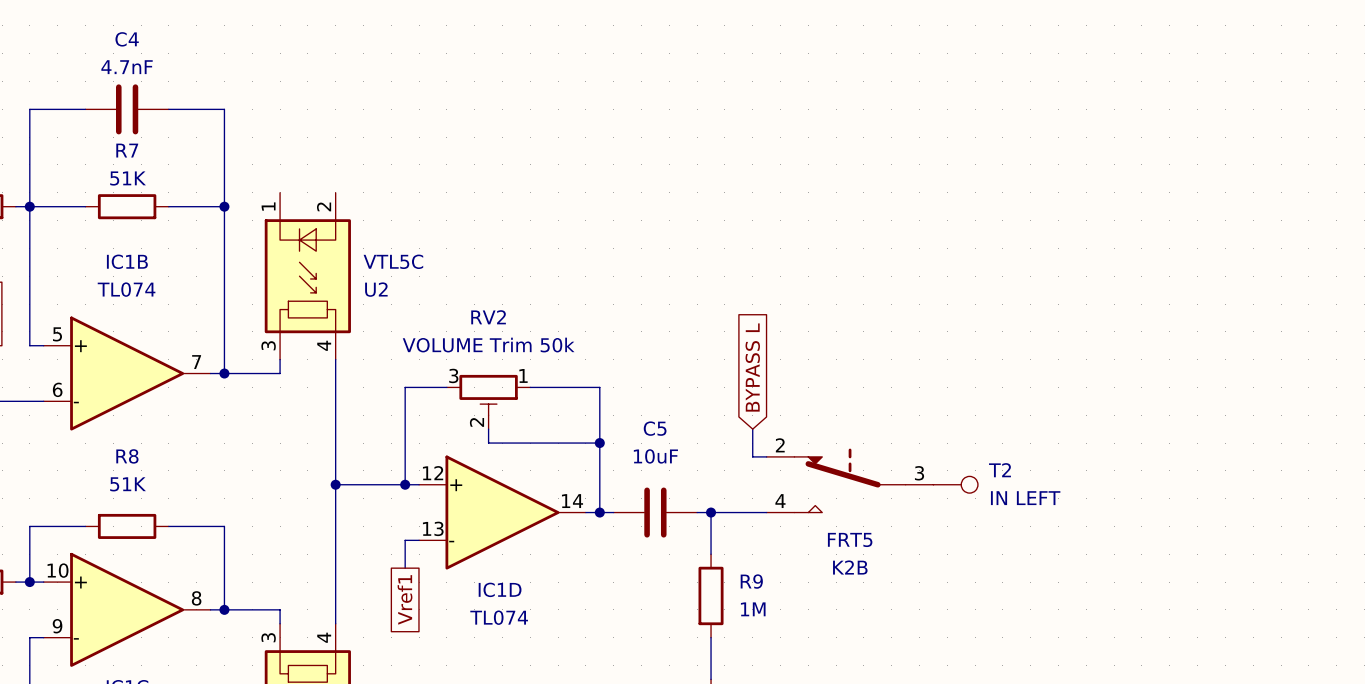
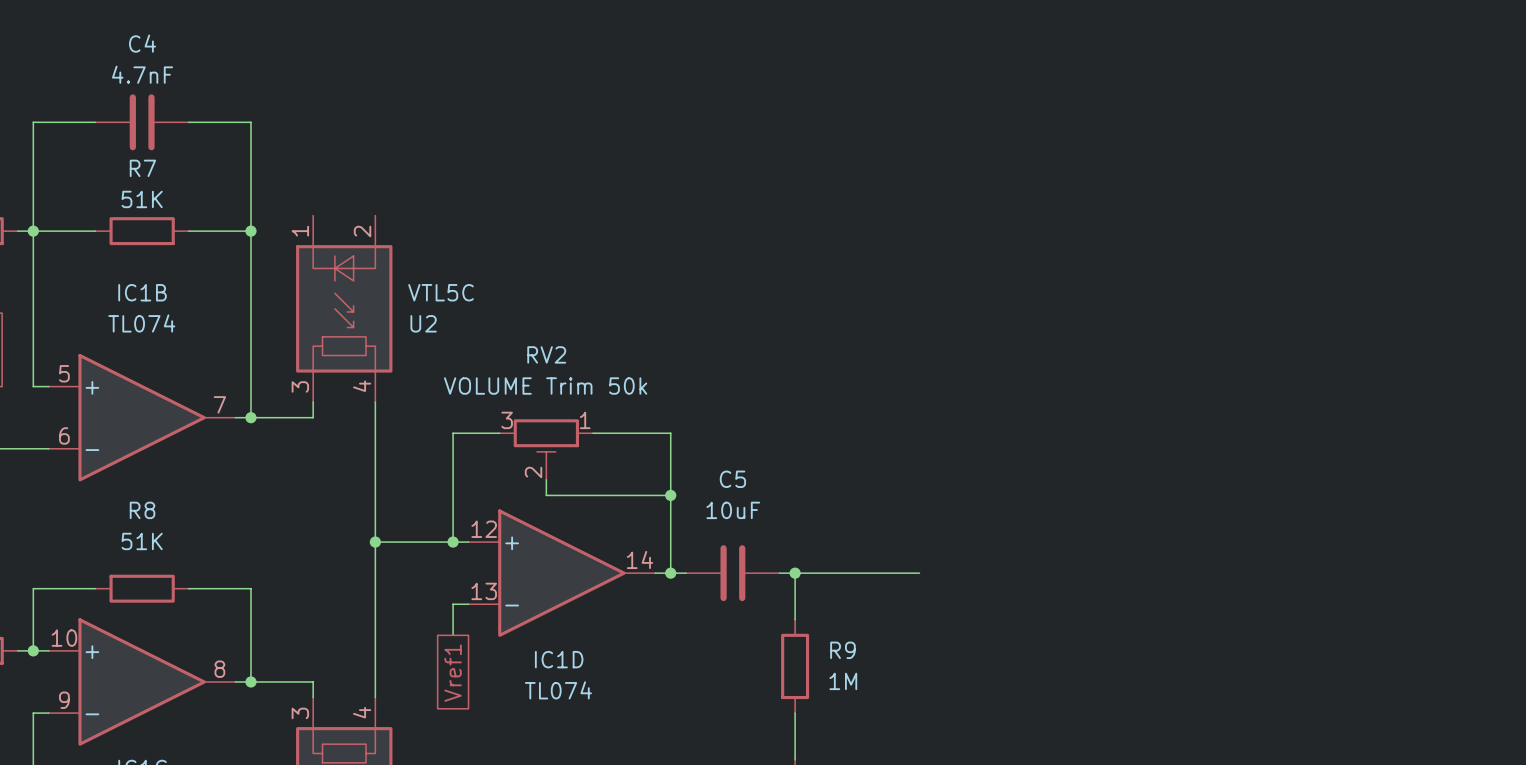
global label: BYPASS L (752, 367) -> none
wire: (752, 429) (752, 456) (766, 456) -> none
K2B: FRT5 (850, 480) -> none
T2: IN LEFT (955, 484) -> none

